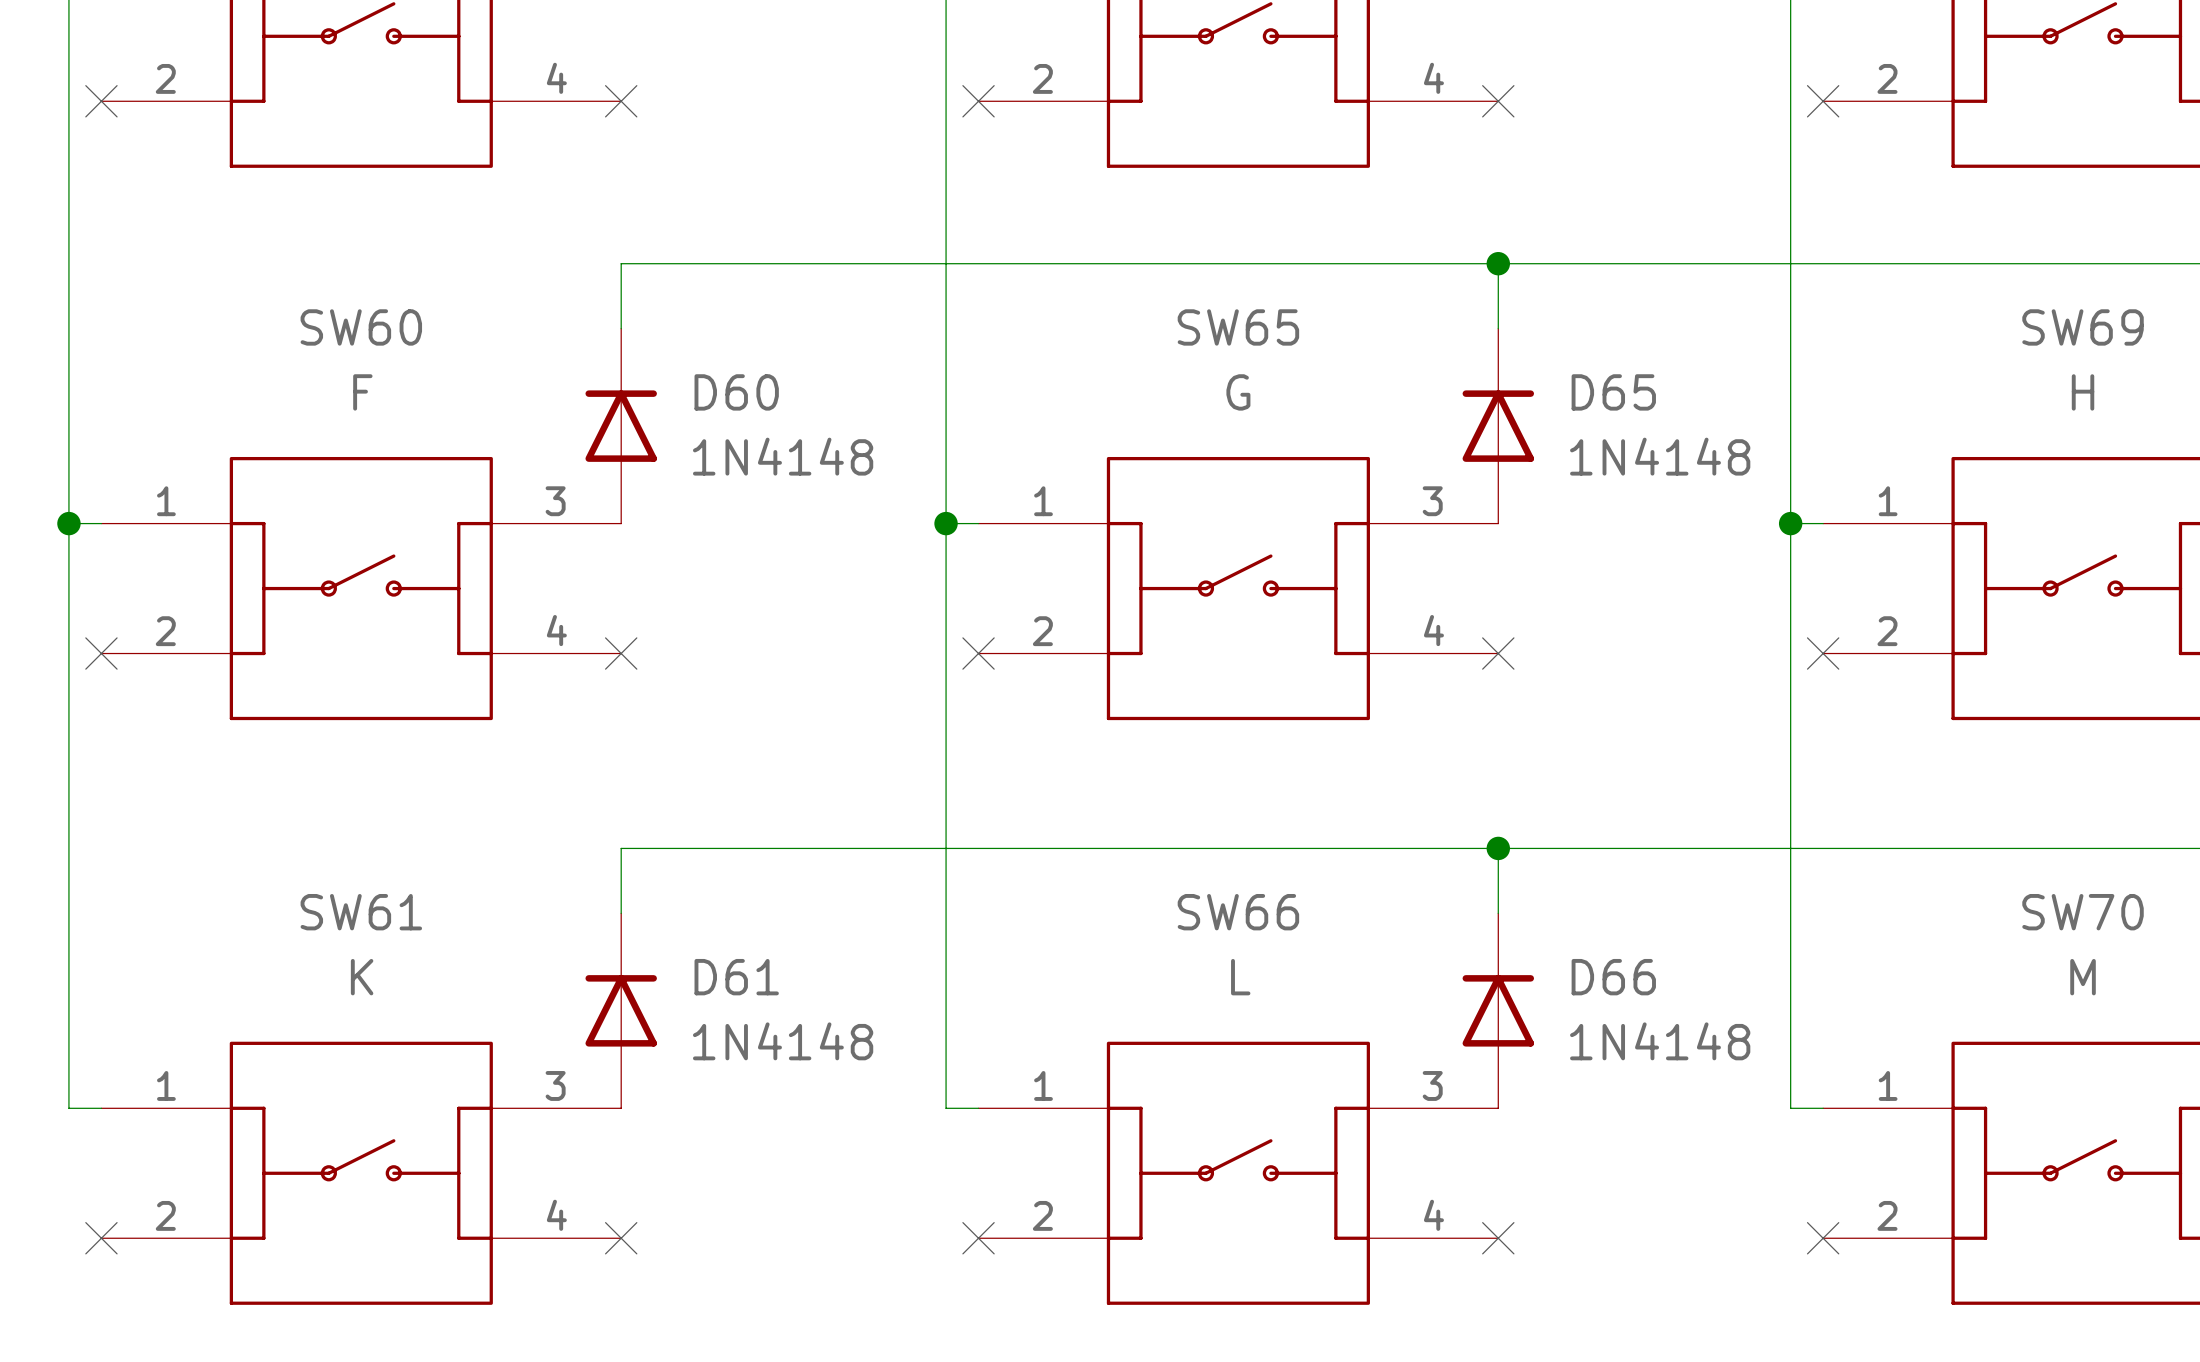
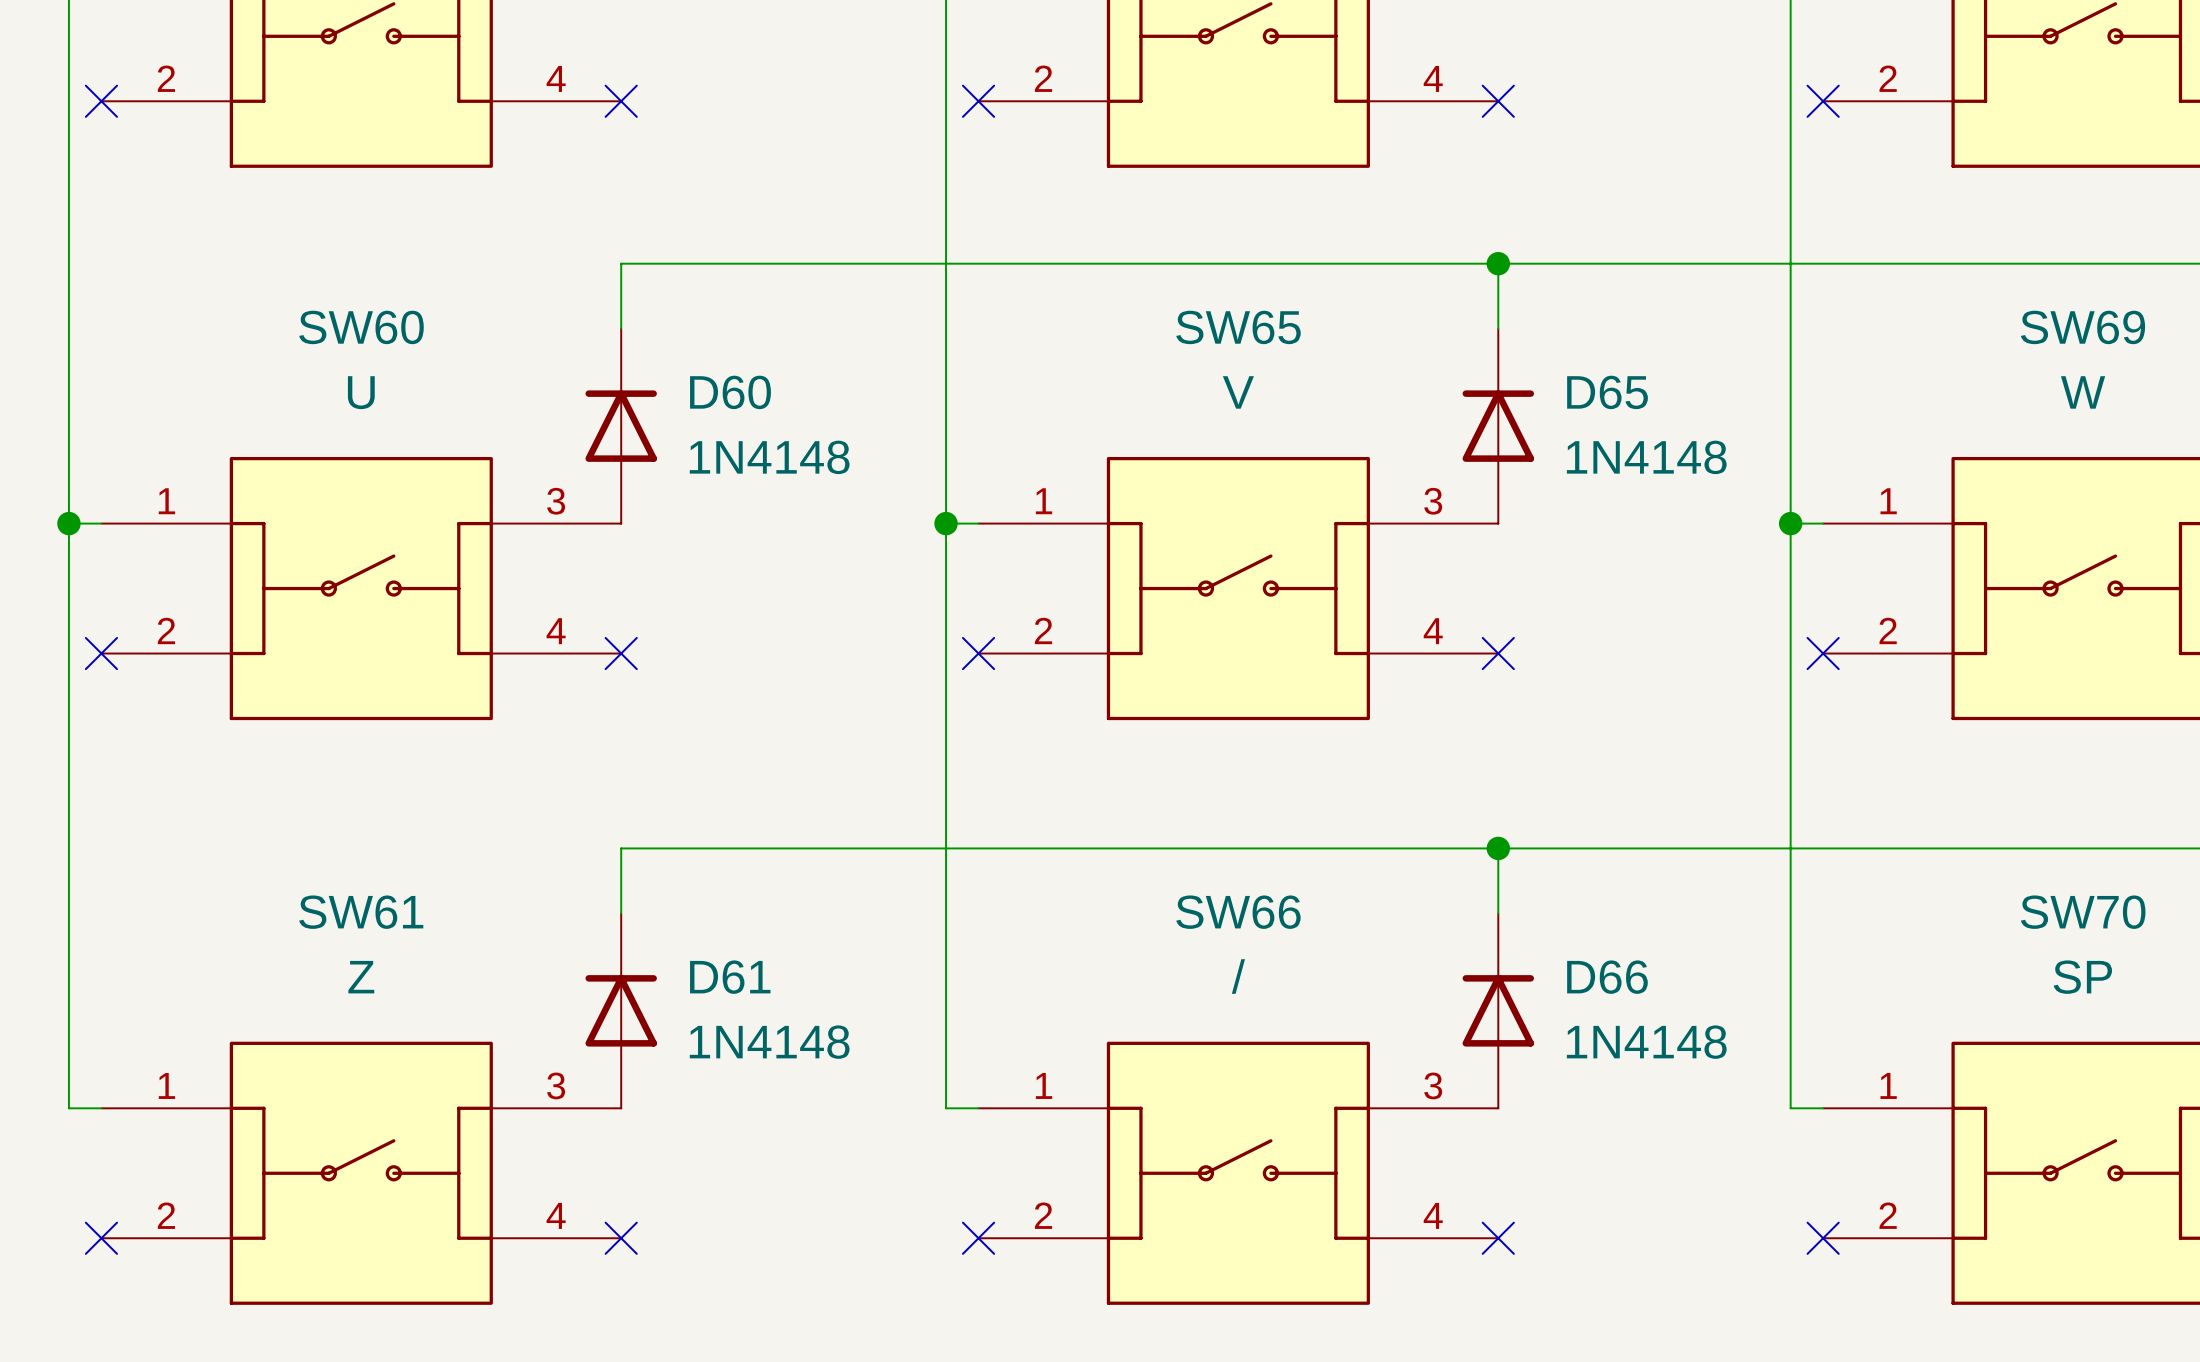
SW60 value: F (362, 392) -> U (361, 392)
SW65 value: G (1238, 392) -> V (1238, 392)
SW69 value: H (2083, 392) -> W (2083, 392)
SW61 value: K (362, 977) -> Z (361, 977)
SW66 value: L (1240, 977) -> / (1238, 976)
SW70 value: M (2083, 977) -> SP (2082, 977)

